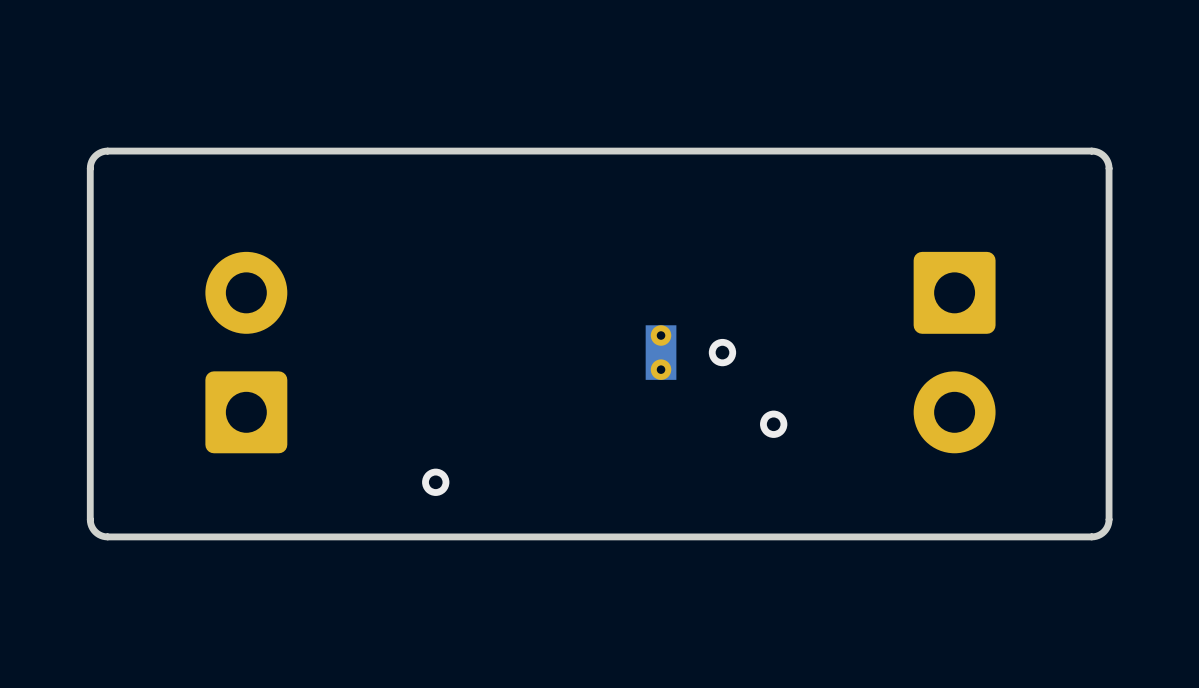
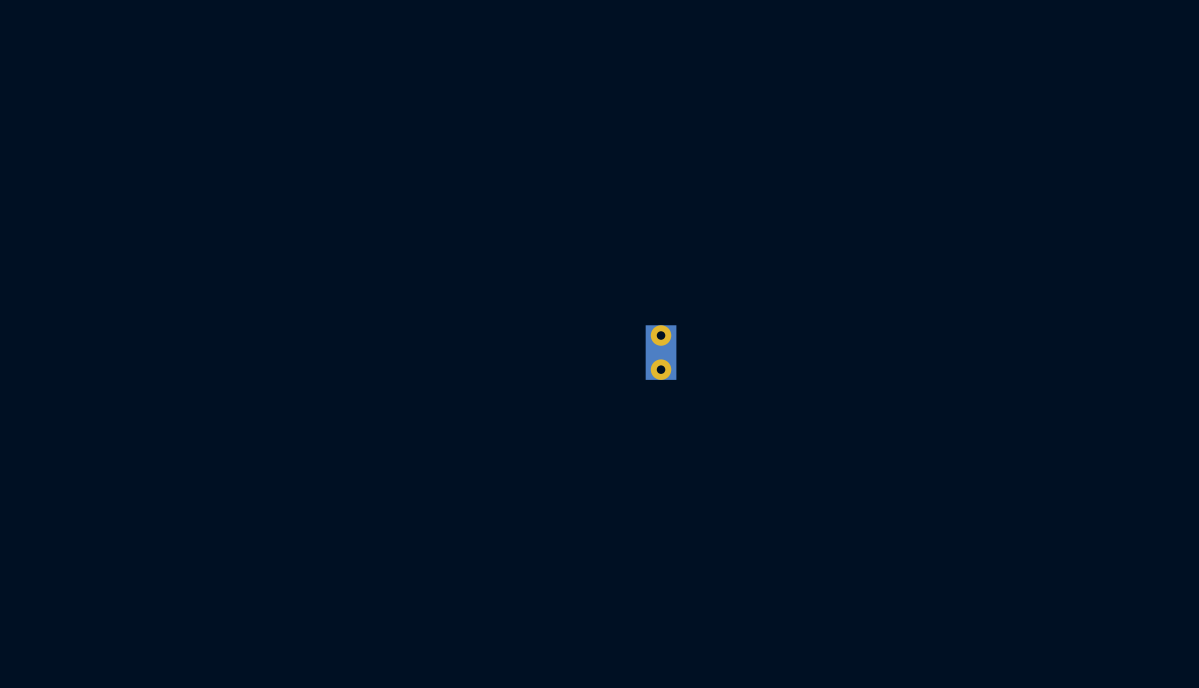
board edge: (1091, 151) (100, 152) (93, 157) (90, 168) (91, 526) (98, 534) (107, 536) (1098, 535) (1105, 530) (1109, 519) (1109, 168) (1103, 156) (1091, 151) -> none
part: (246, 352) -> none
via: (722, 352) -> none
part: (954, 352) -> none
via: (773, 424) -> none
via: (435, 482) -> none

